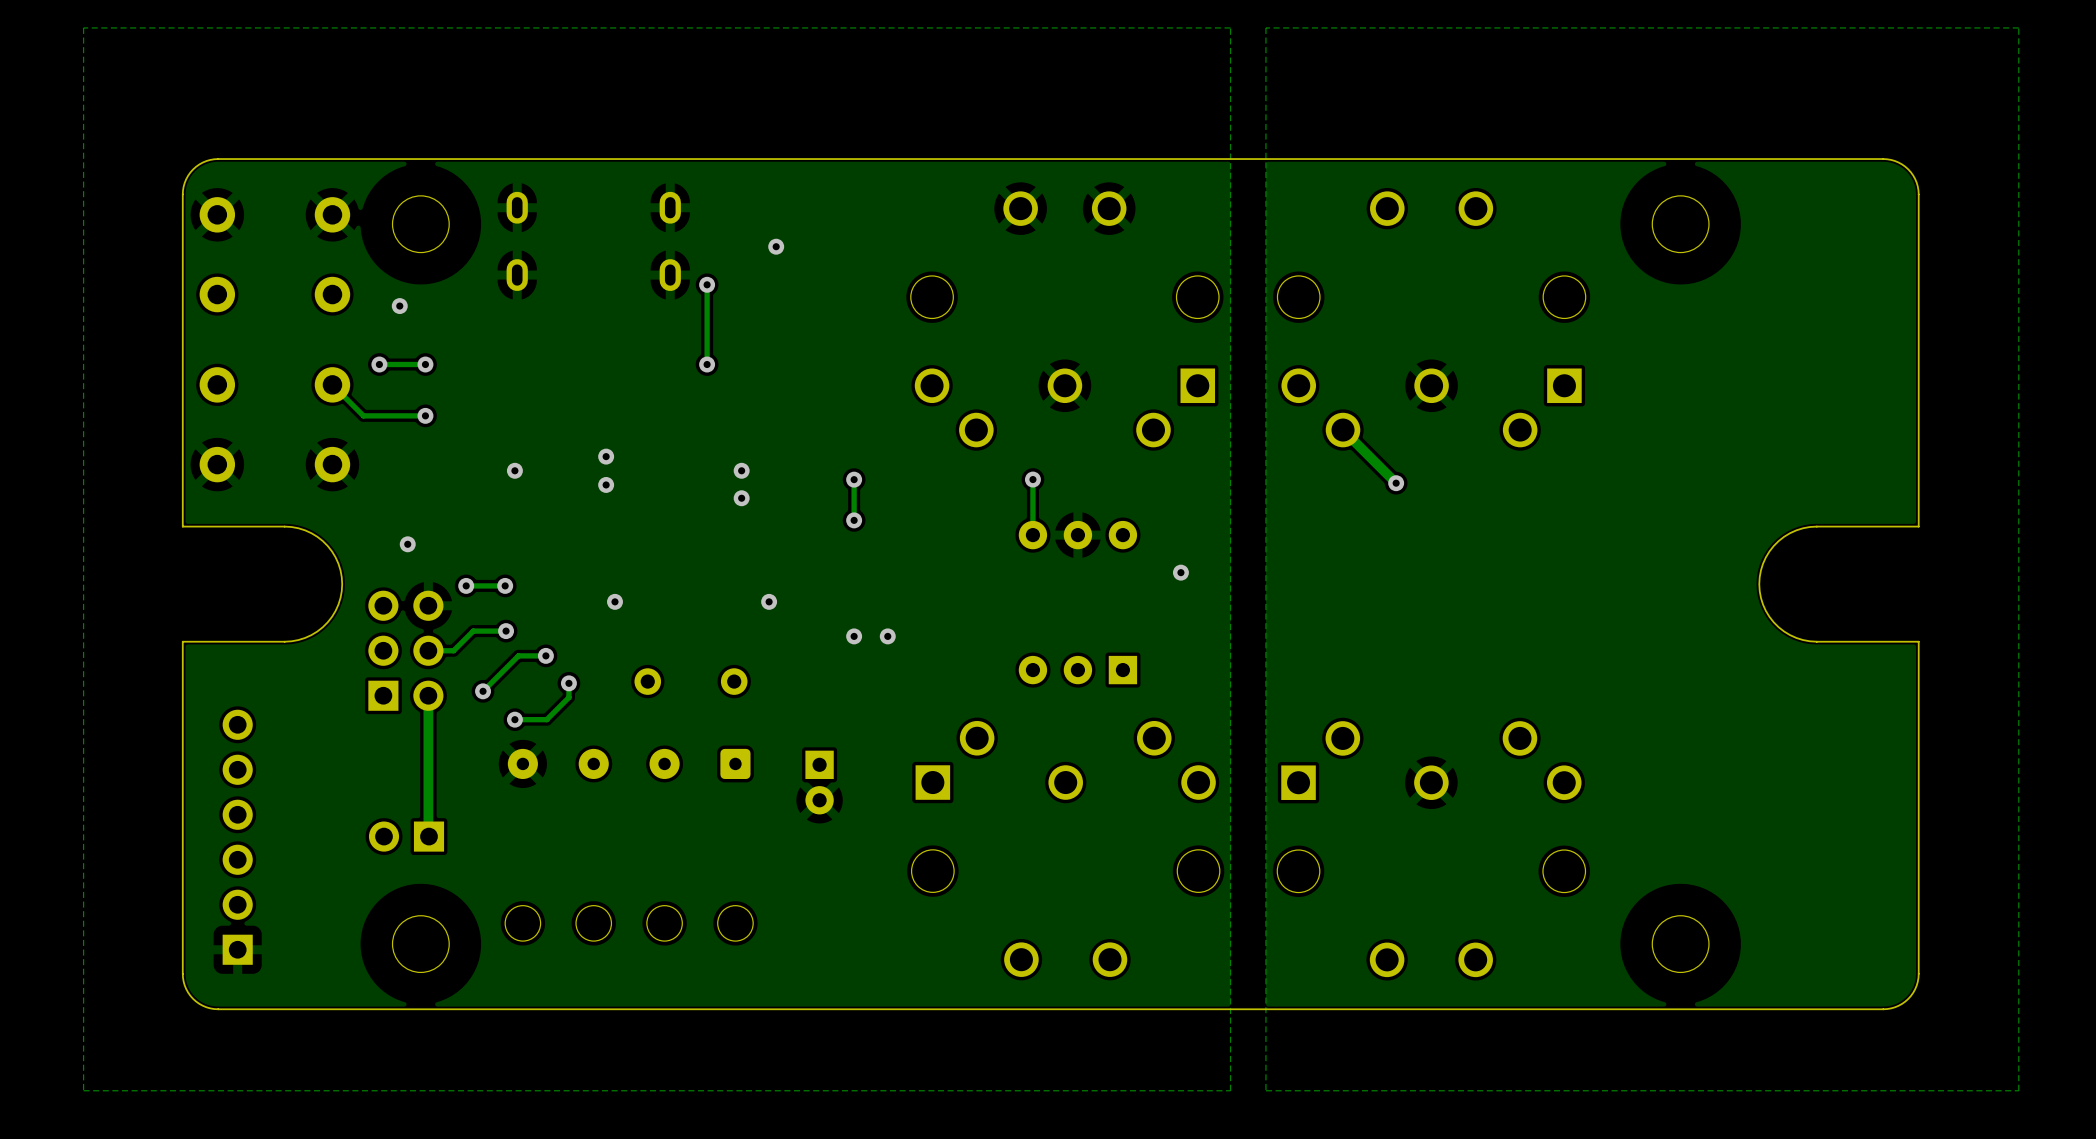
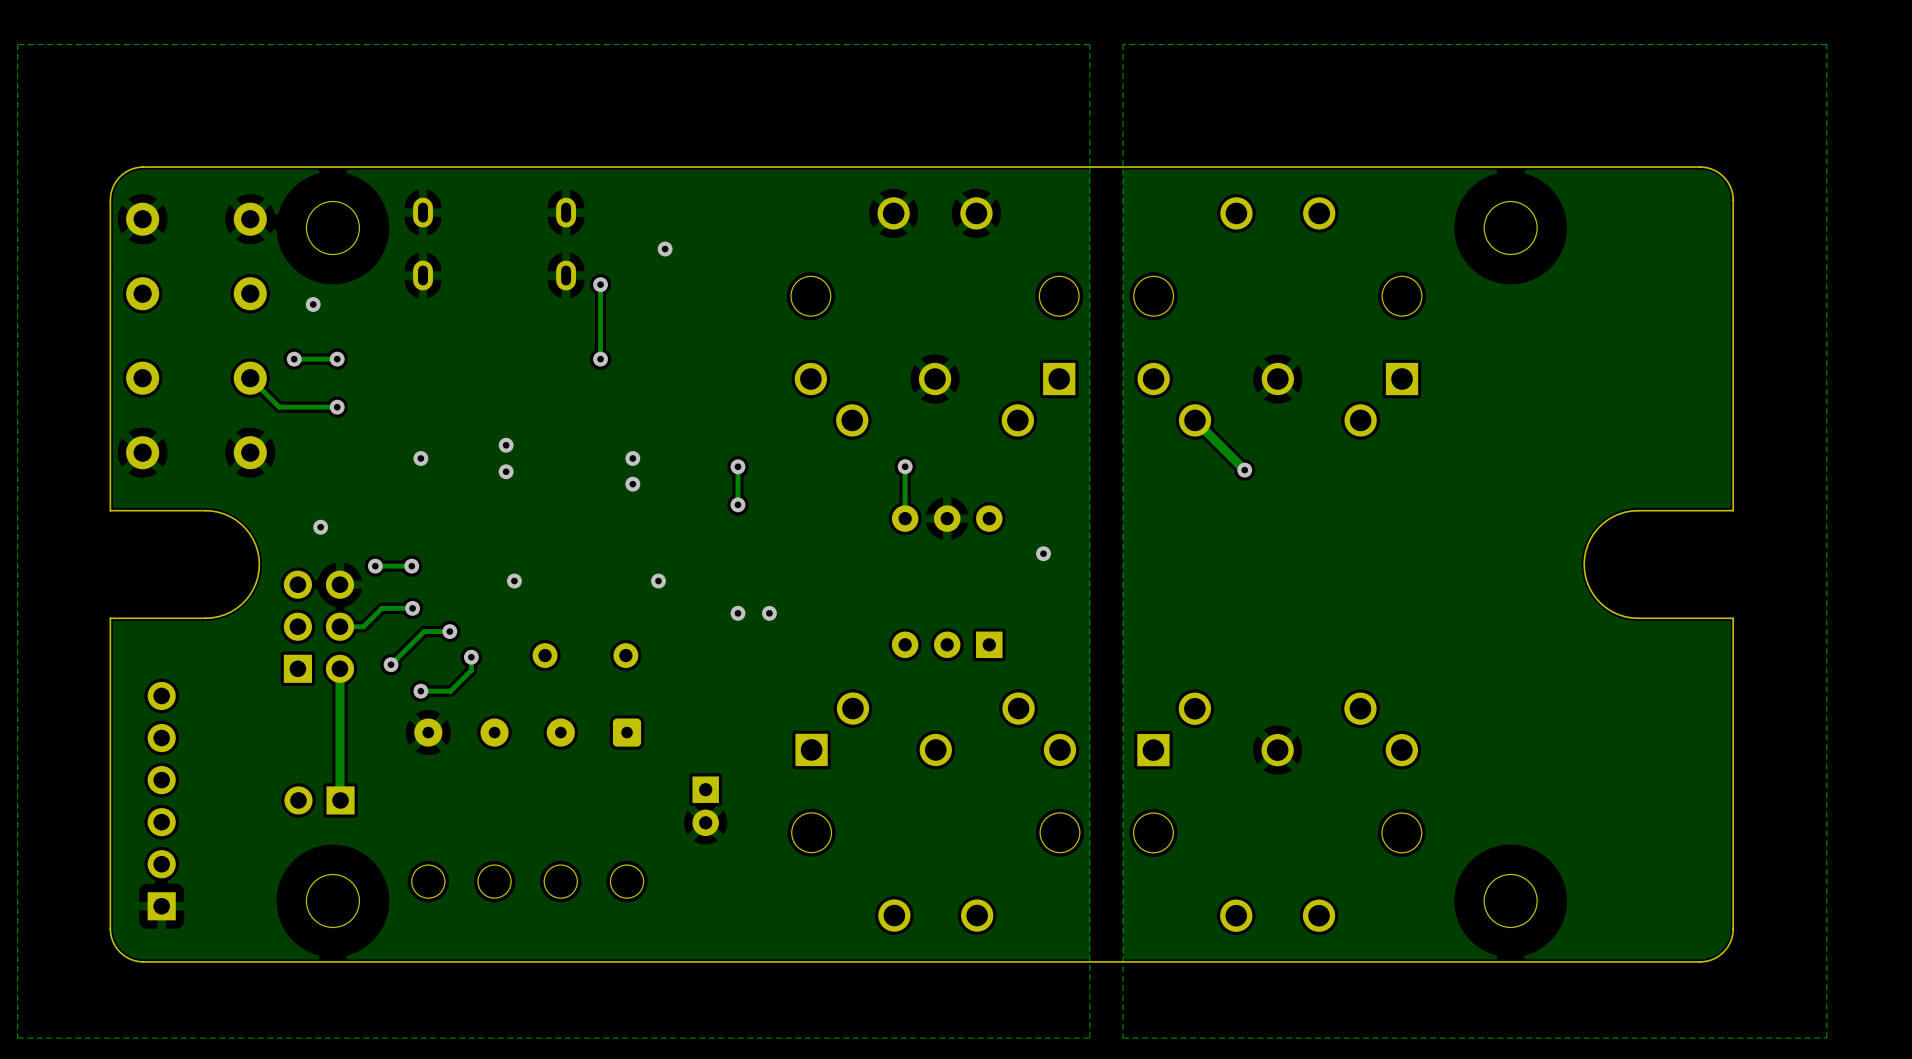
part position: (819, 782) -> (705, 806)

